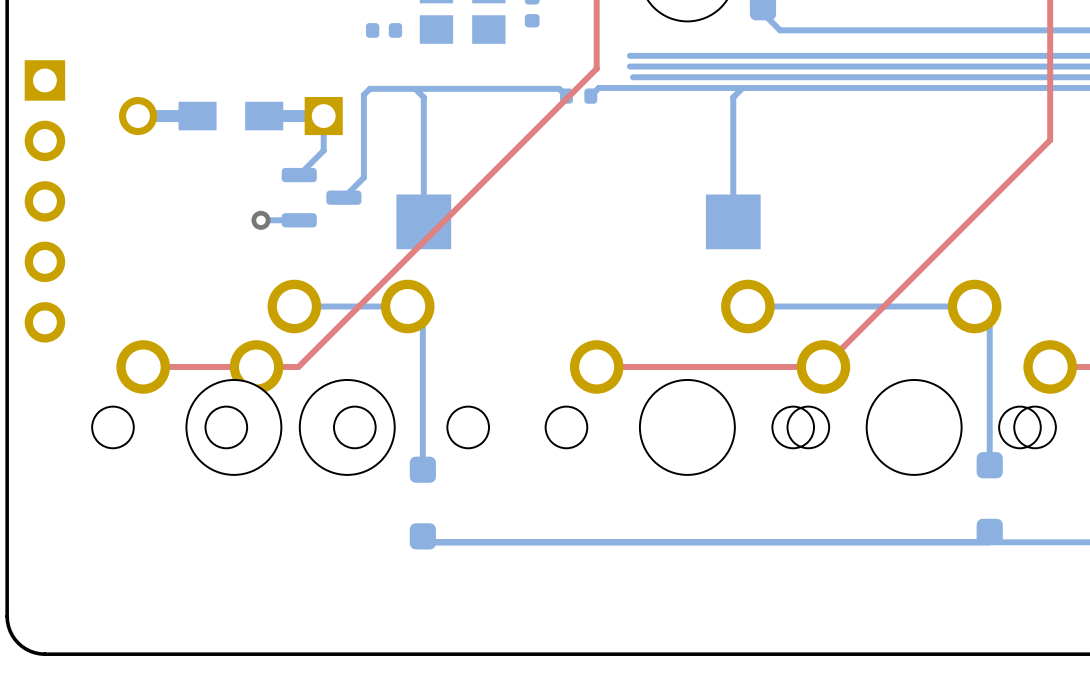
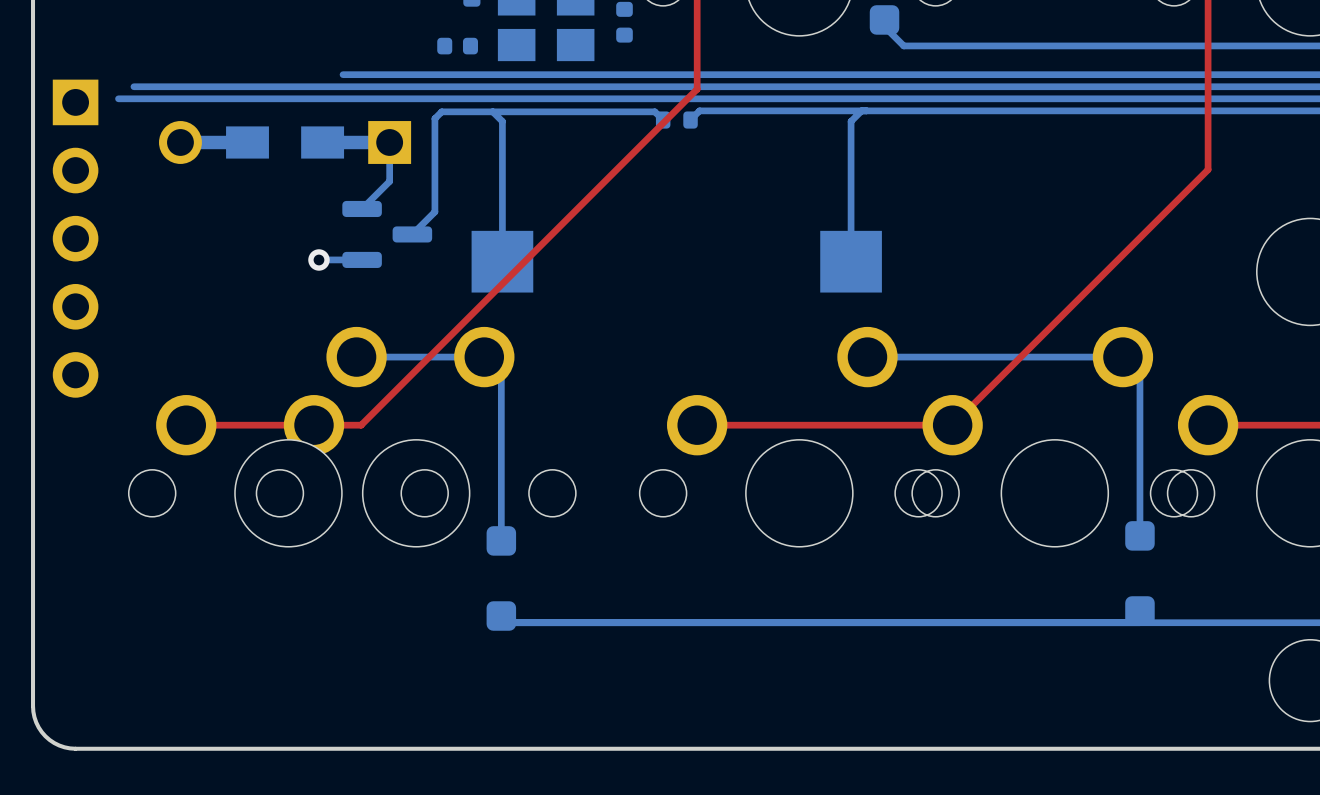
bottom track: none -> (343, 74) (734, 74)
bottom track: none -> (133, 86) (734, 86)
bottom track: none -> (118, 98) (738, 98)

